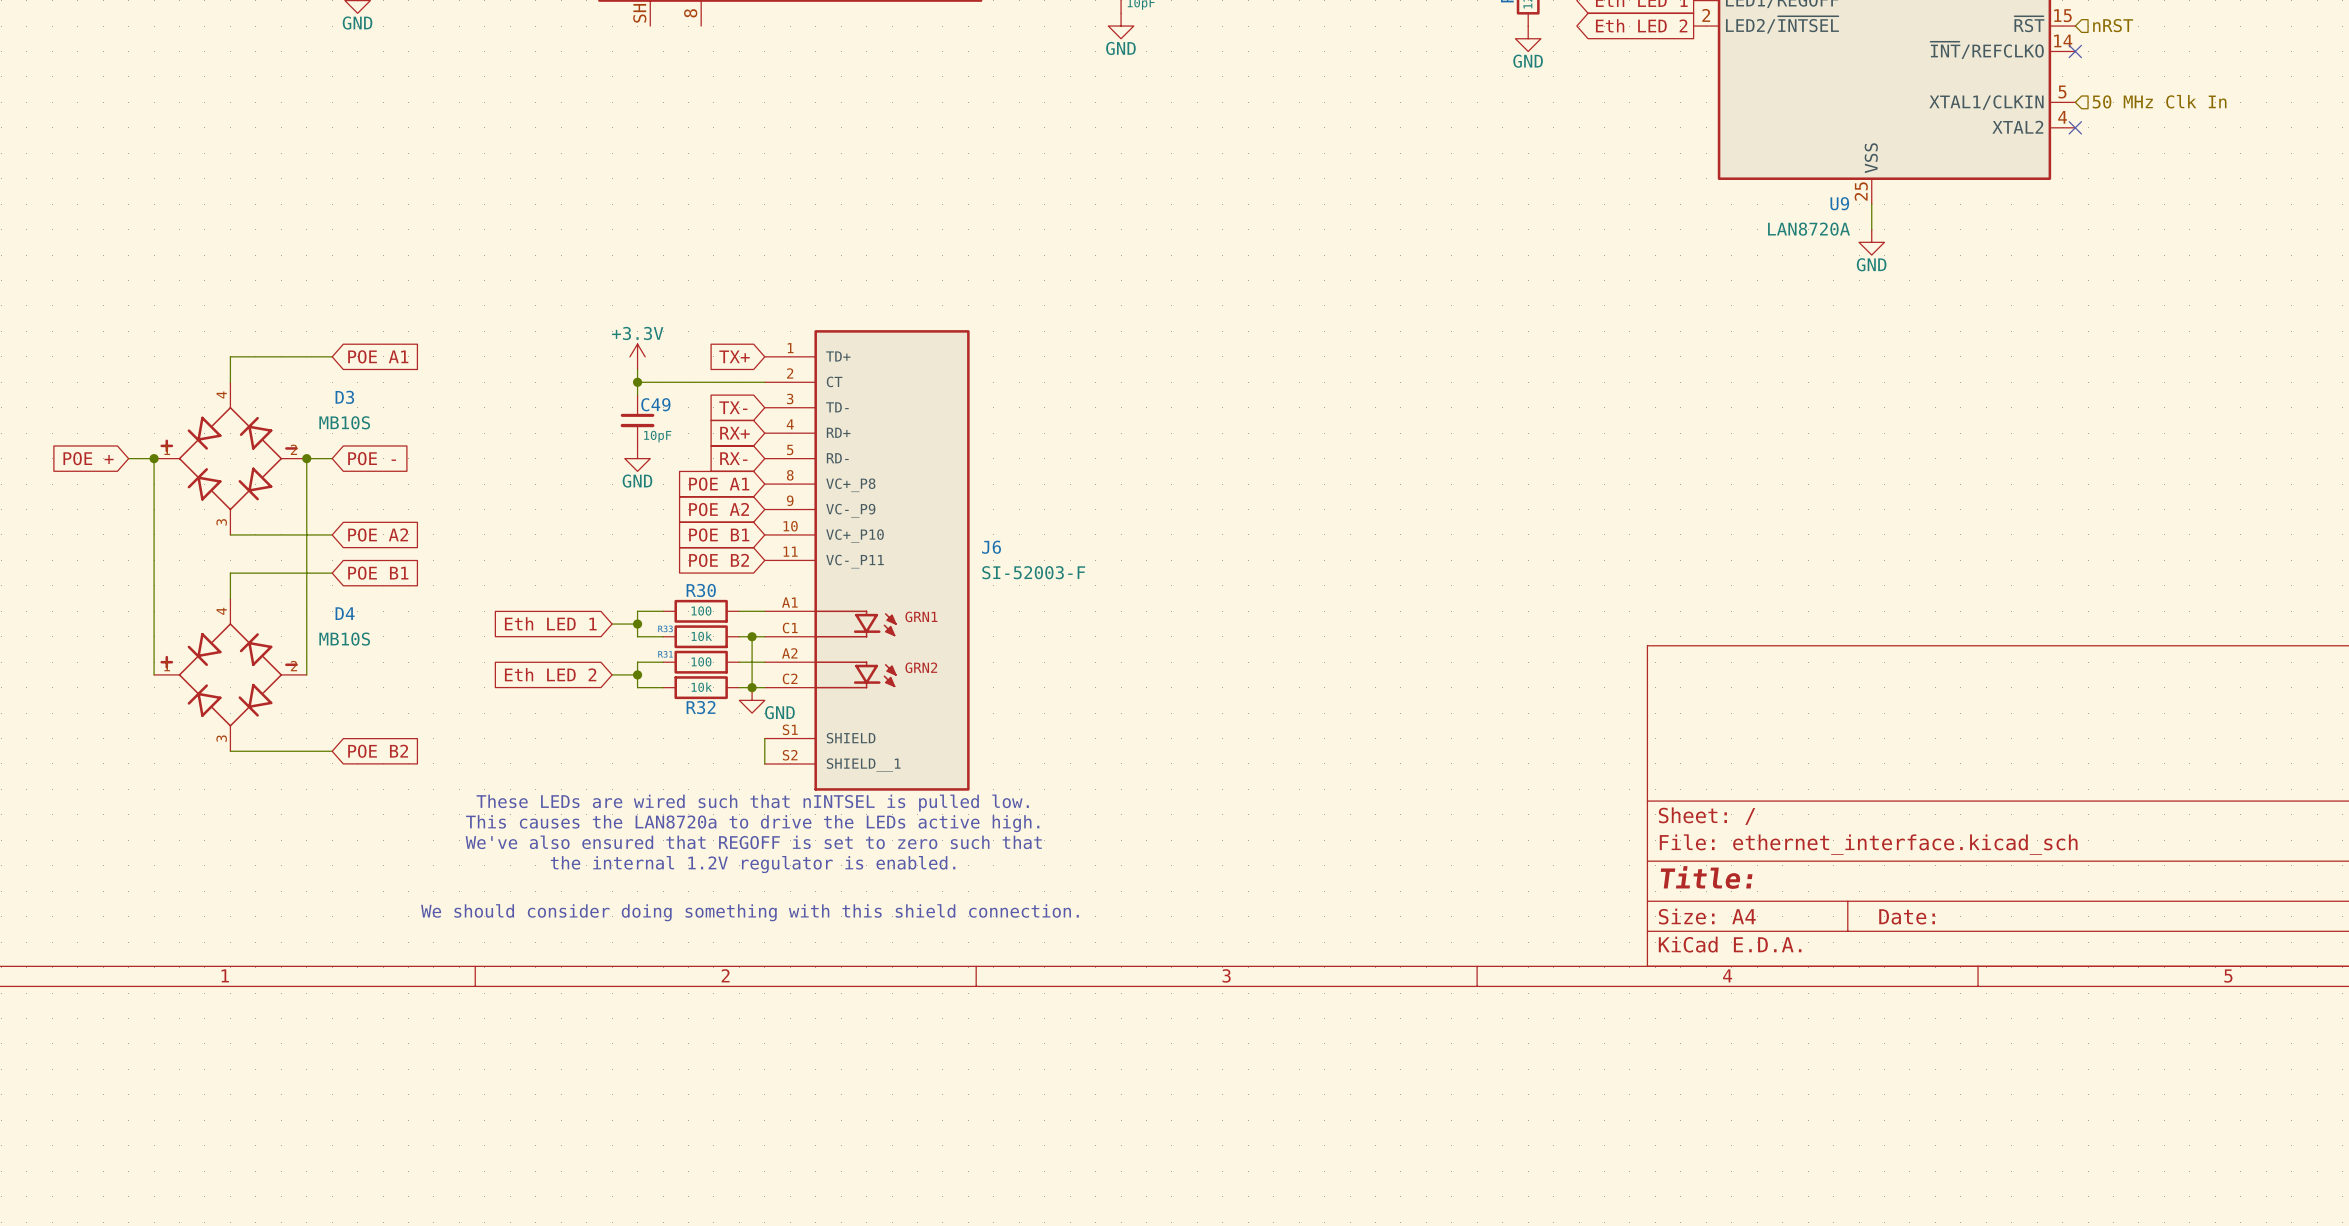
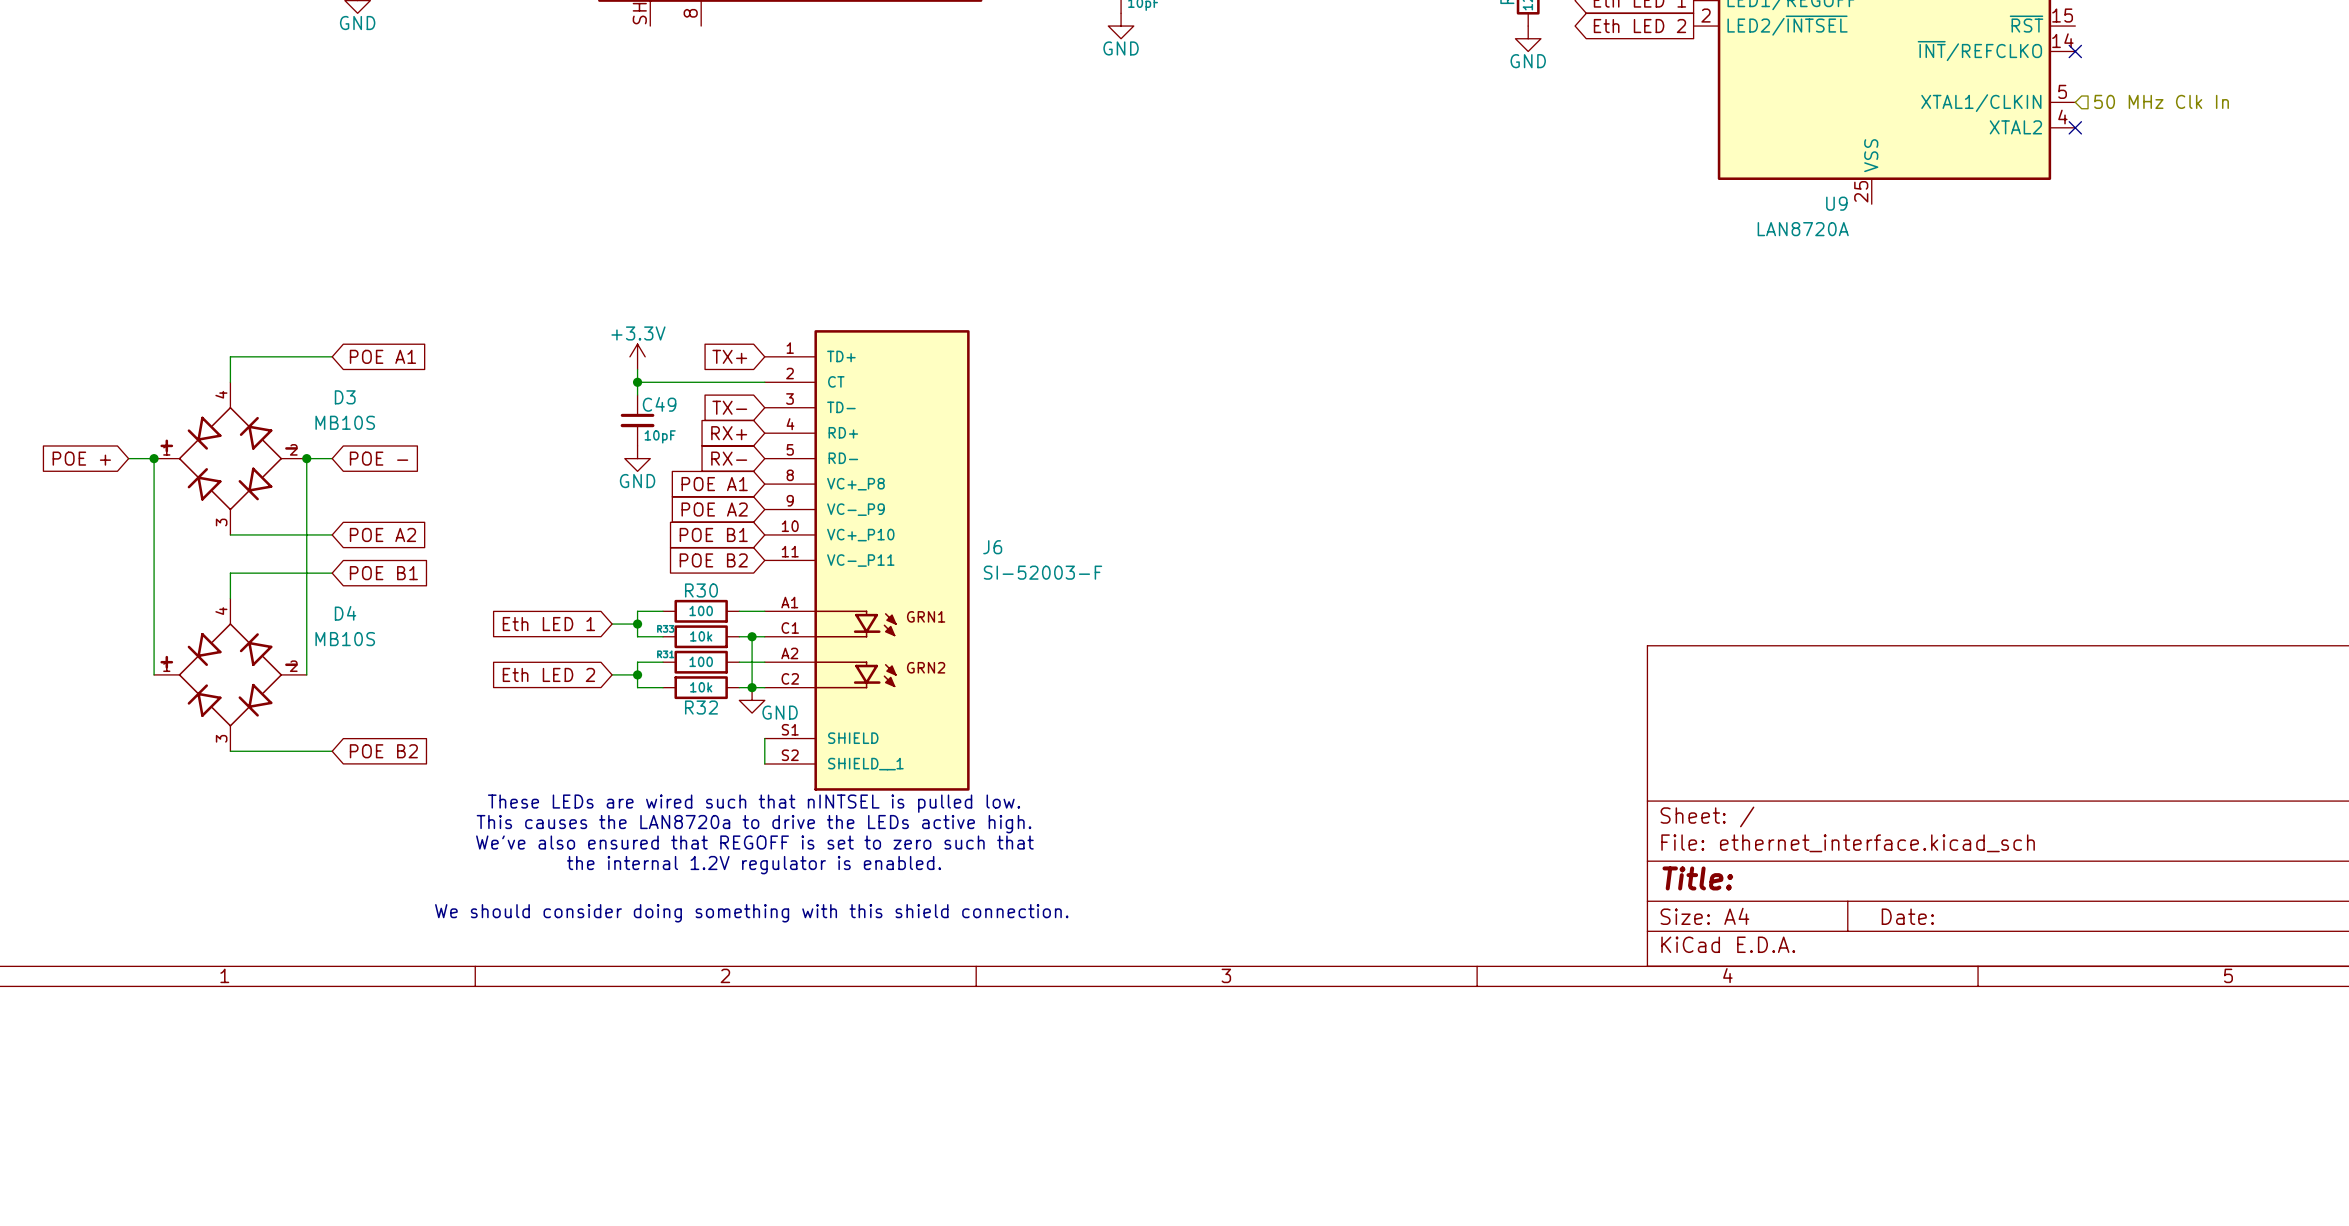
hierarchical label: nRST (2113, 25) -> none
wire: (1871, 204) (1871, 229) -> none
power symbol: GND (1871, 242) -> none

